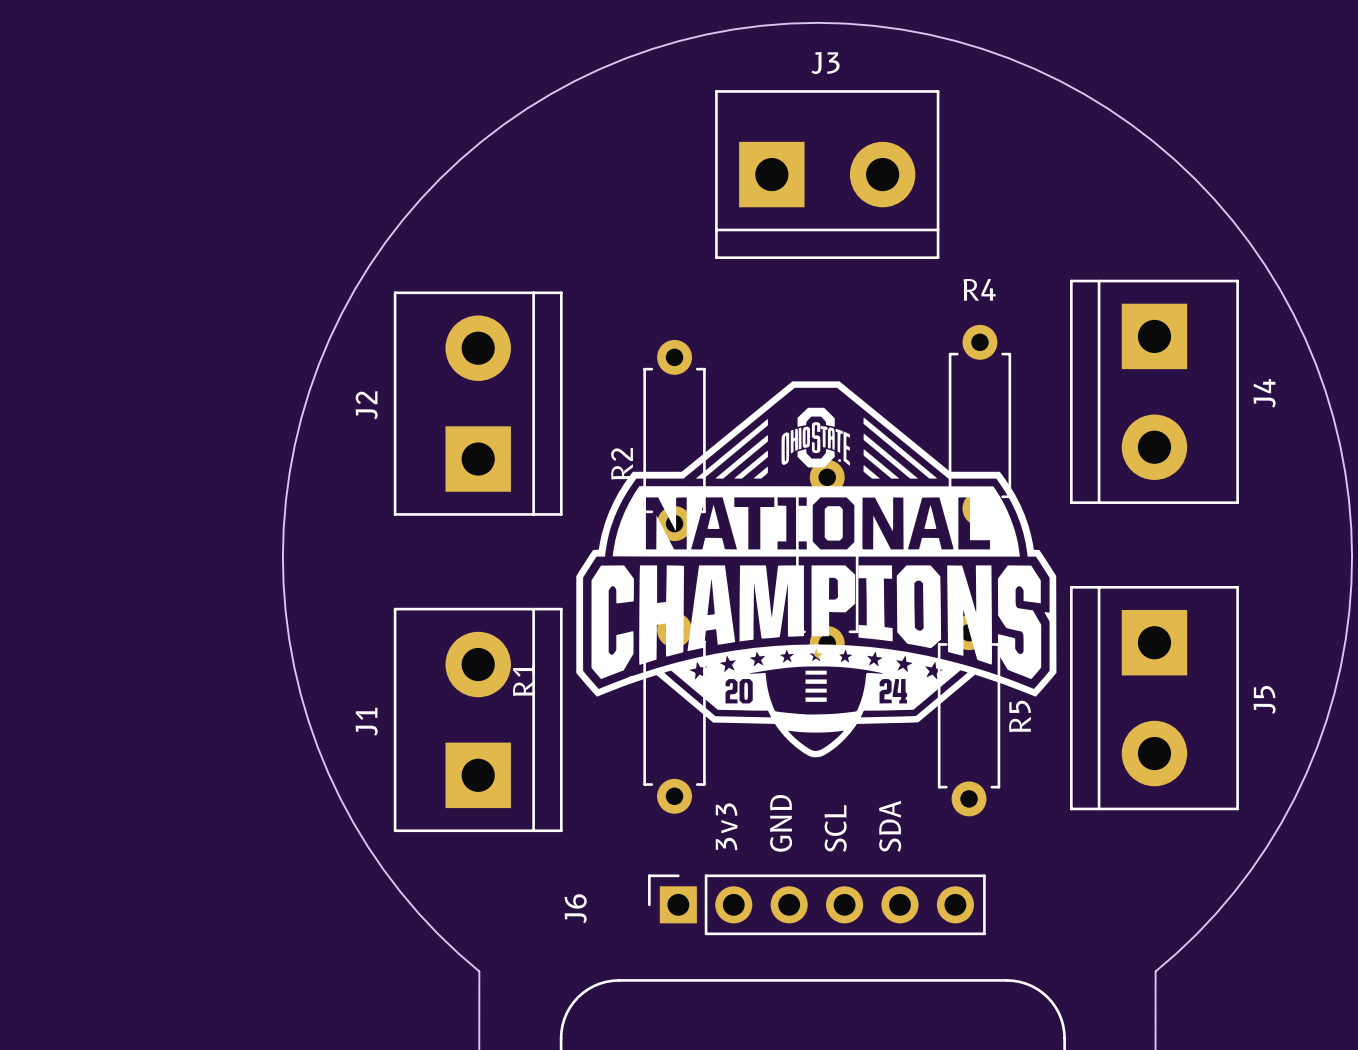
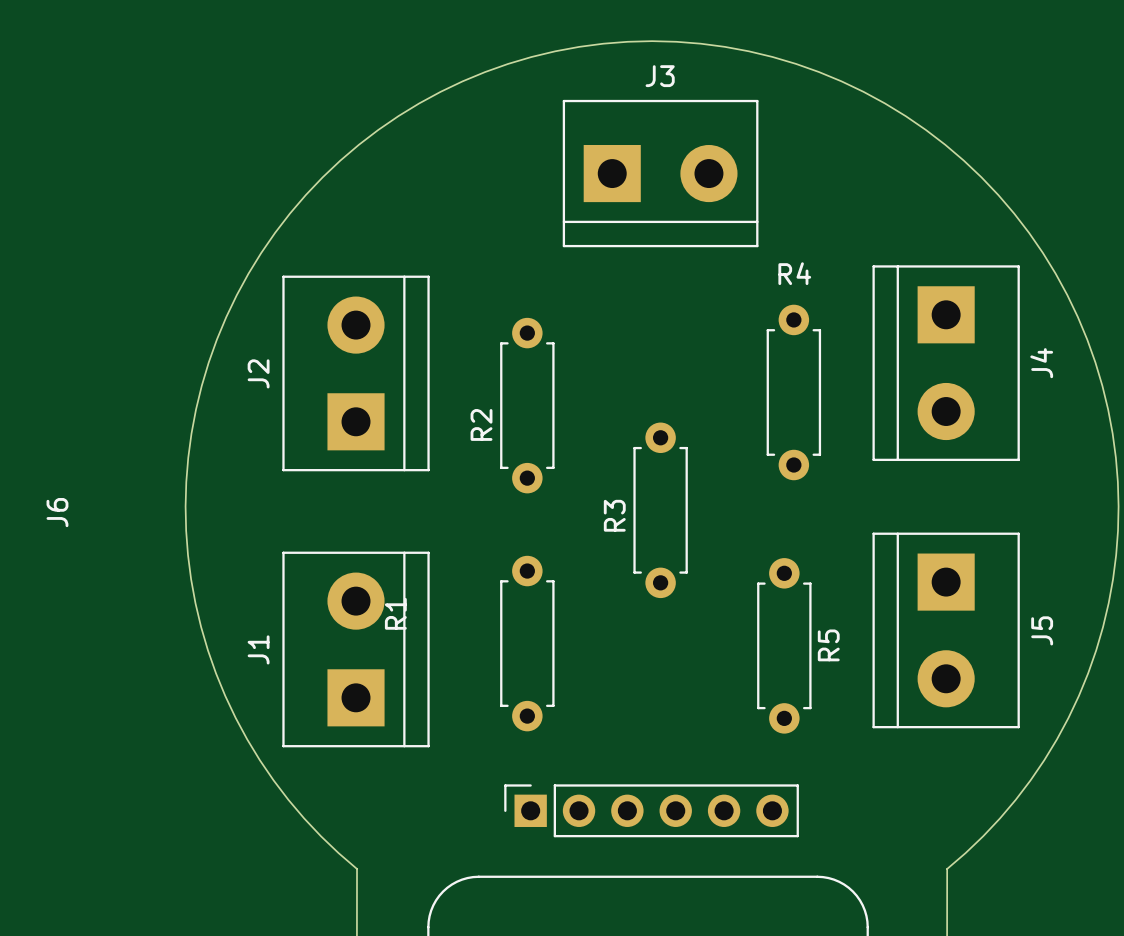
drawing: [576, 381, 1057, 758] -> none
R3 name: none -> R3 (614, 515)
text: GND (781, 823) -> none
text: 3v3 (726, 826) -> none
text: SDA (890, 826) -> none
text: SCL (835, 828) -> none
J6 name position: J6 (575, 908) -> J6 (57, 512)

